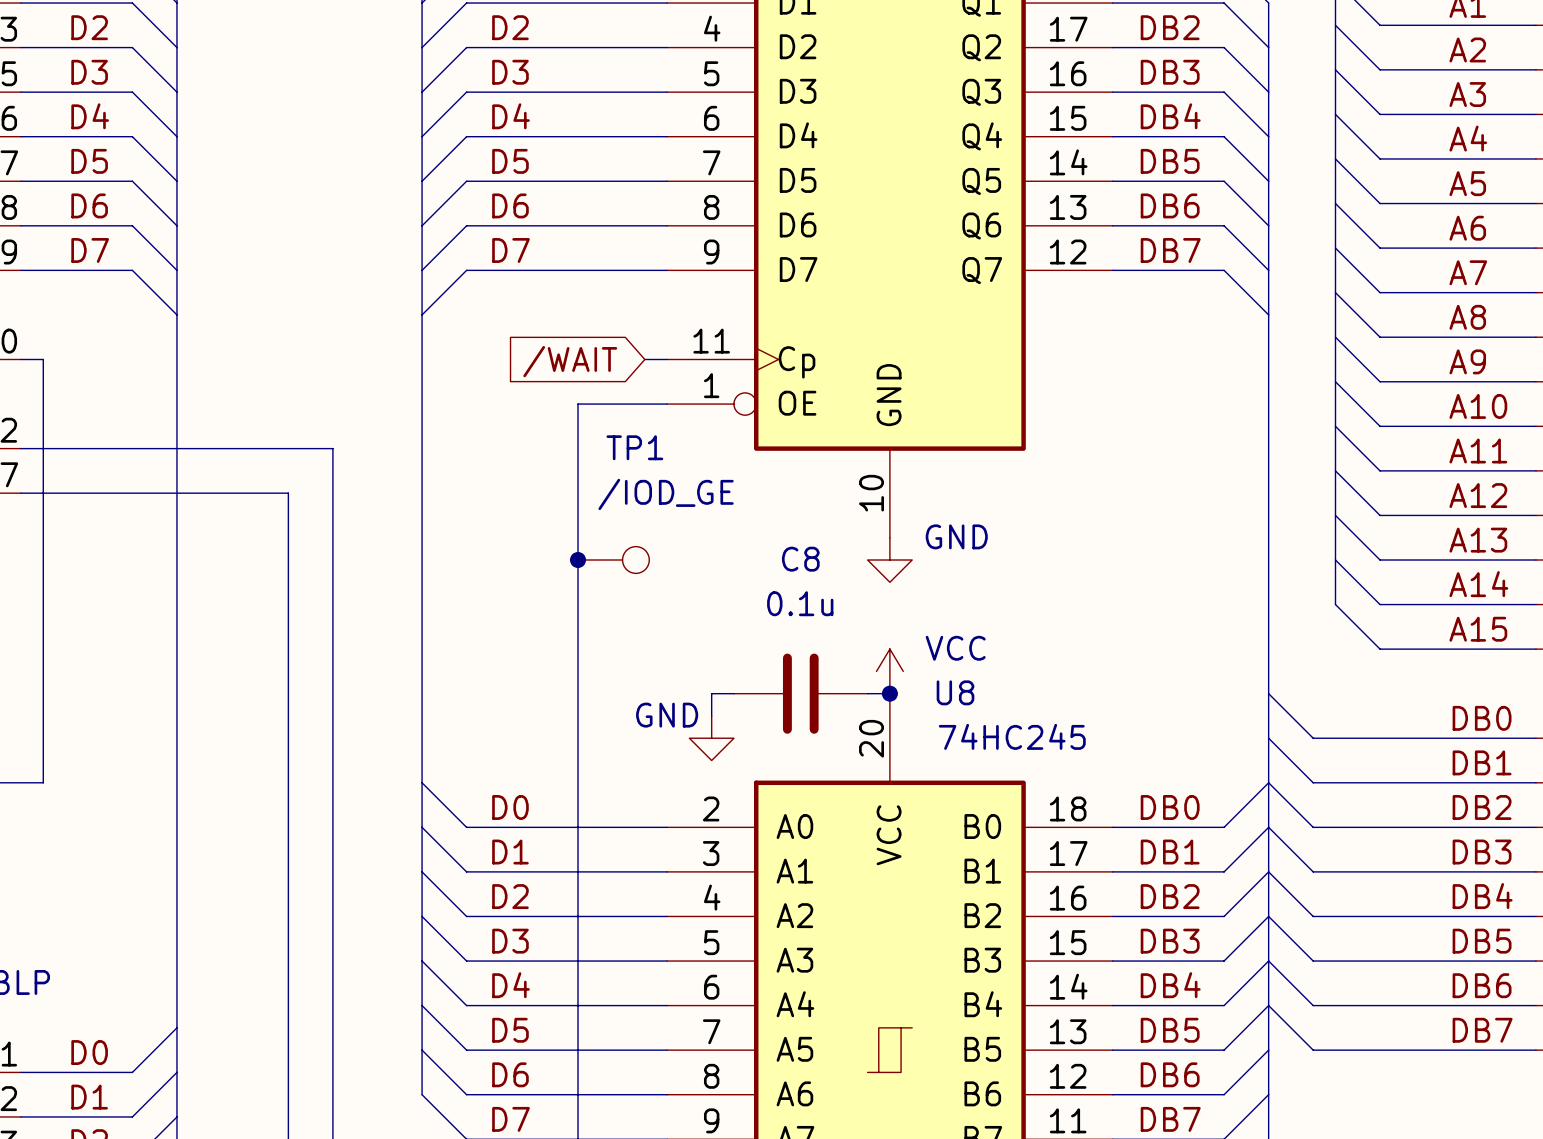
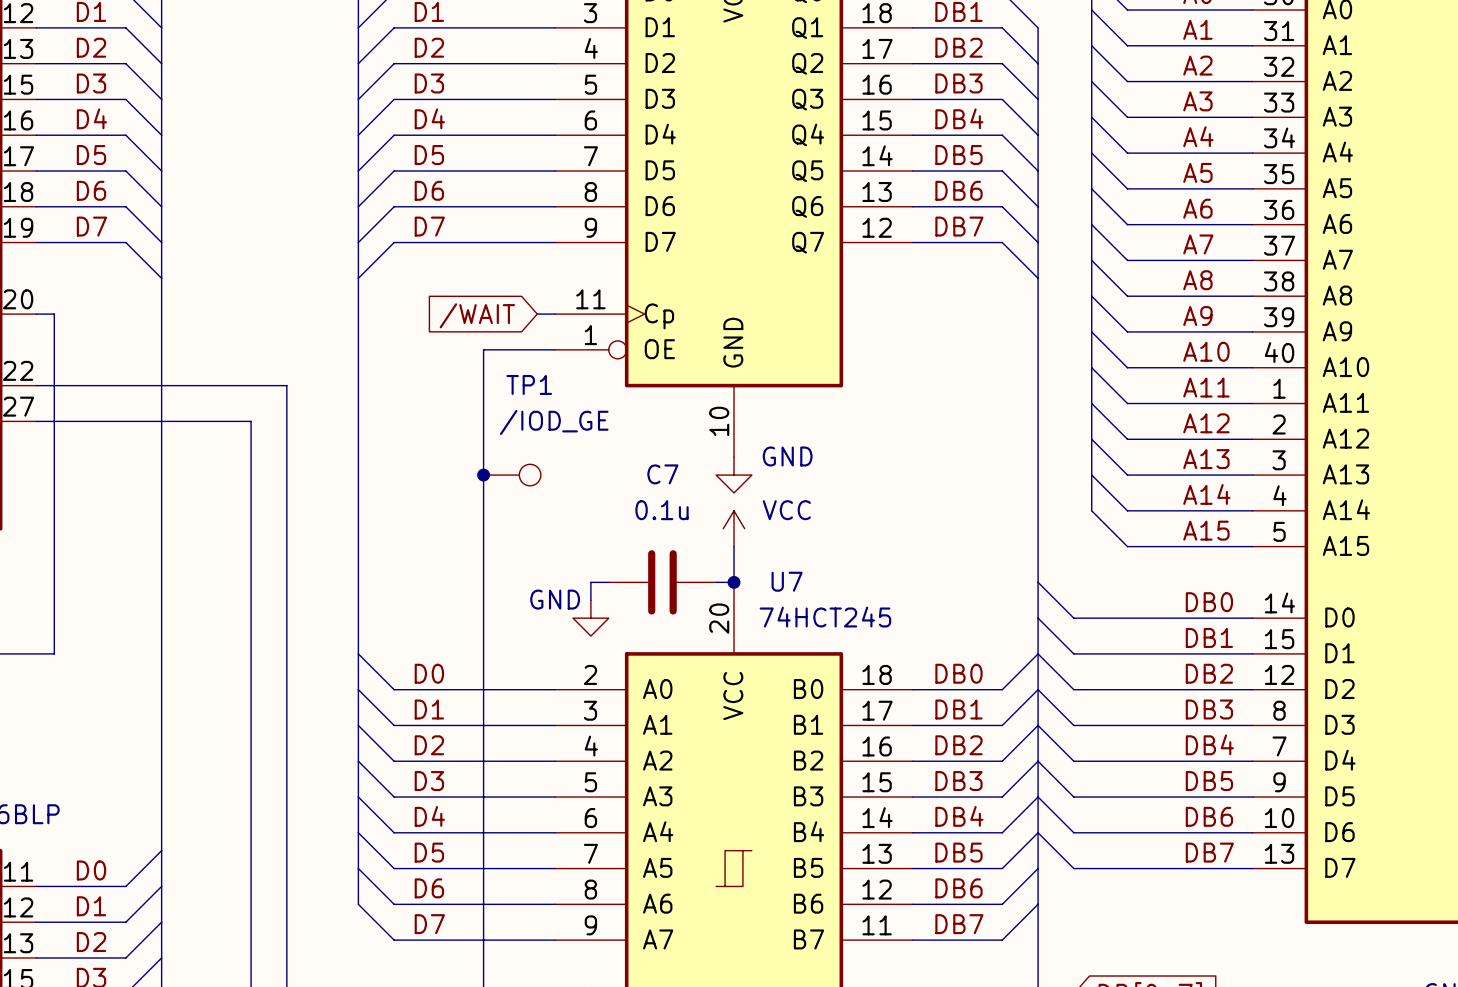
C8 name: C8 (800, 559) -> C7 (662, 474)
power symbol position: VCC (889, 671) -> VCC (733, 528)
U8 name: U8 (955, 692) -> U7 (787, 581)
U8 value: 74HC245 (1012, 736) -> 74HCT245 (825, 617)

